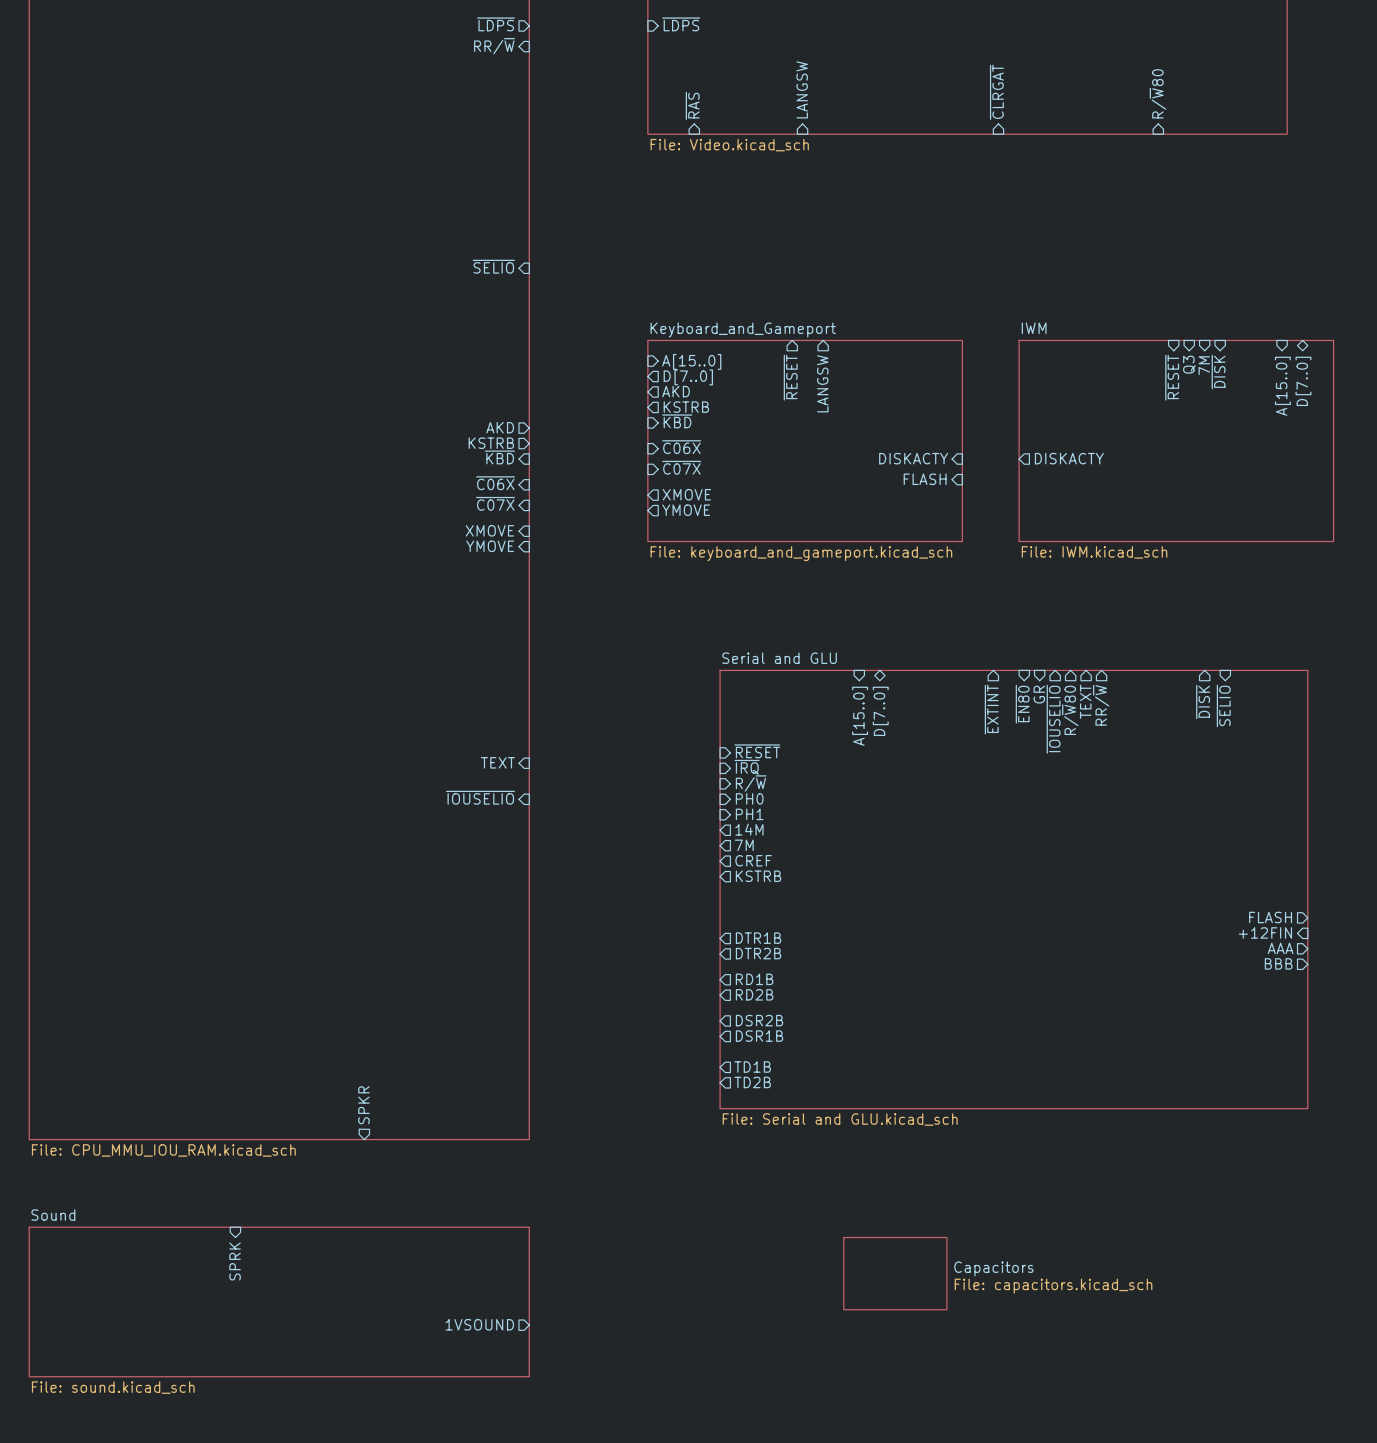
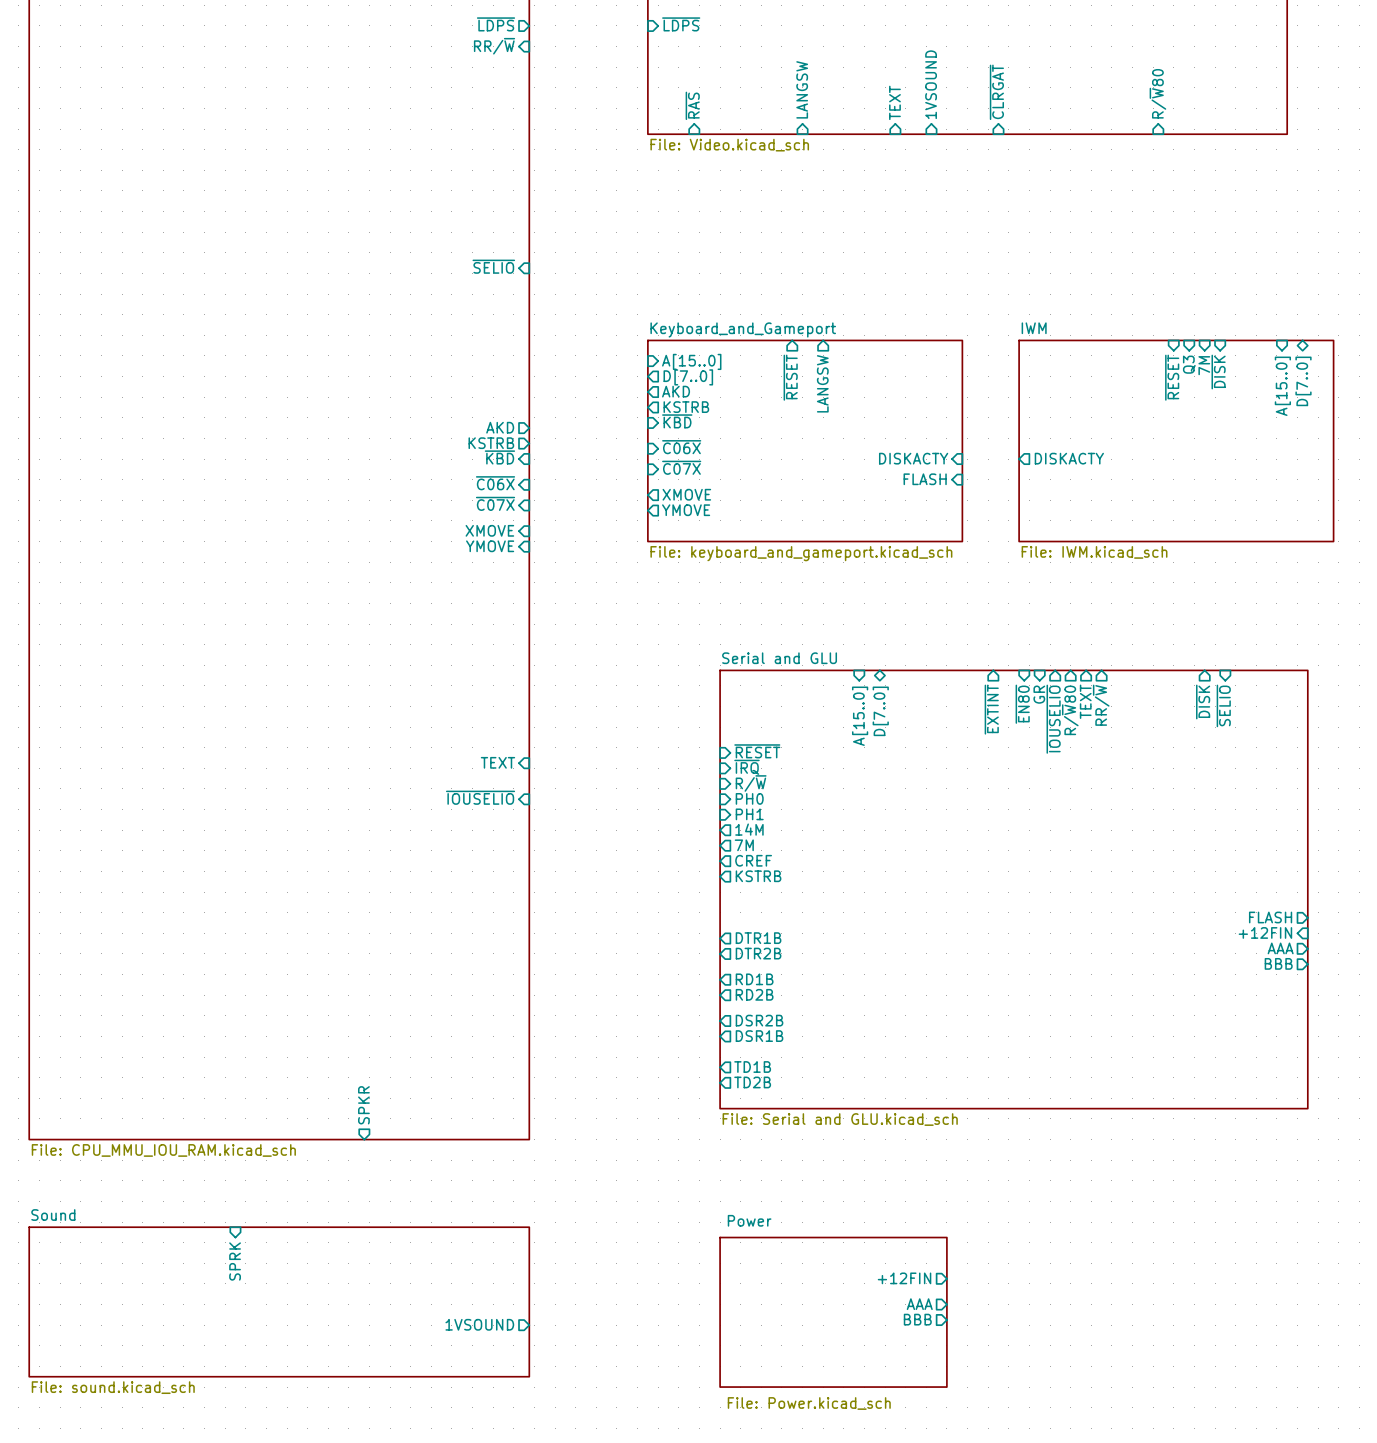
sheet pin: none -> 1VSOUND (931, 84)
sheet pin: none -> TEXT (894, 102)
sheet Capacitors: File: capacitors.kicad_sch (895, 1273) -> none
sheet pin: none -> +12FIN (904, 1278)
sheet pin: none -> AAA (919, 1304)
sheet Power: none -> File: Power.kicad_sch (833, 1312)
sheet pin: none -> BBB (917, 1319)

